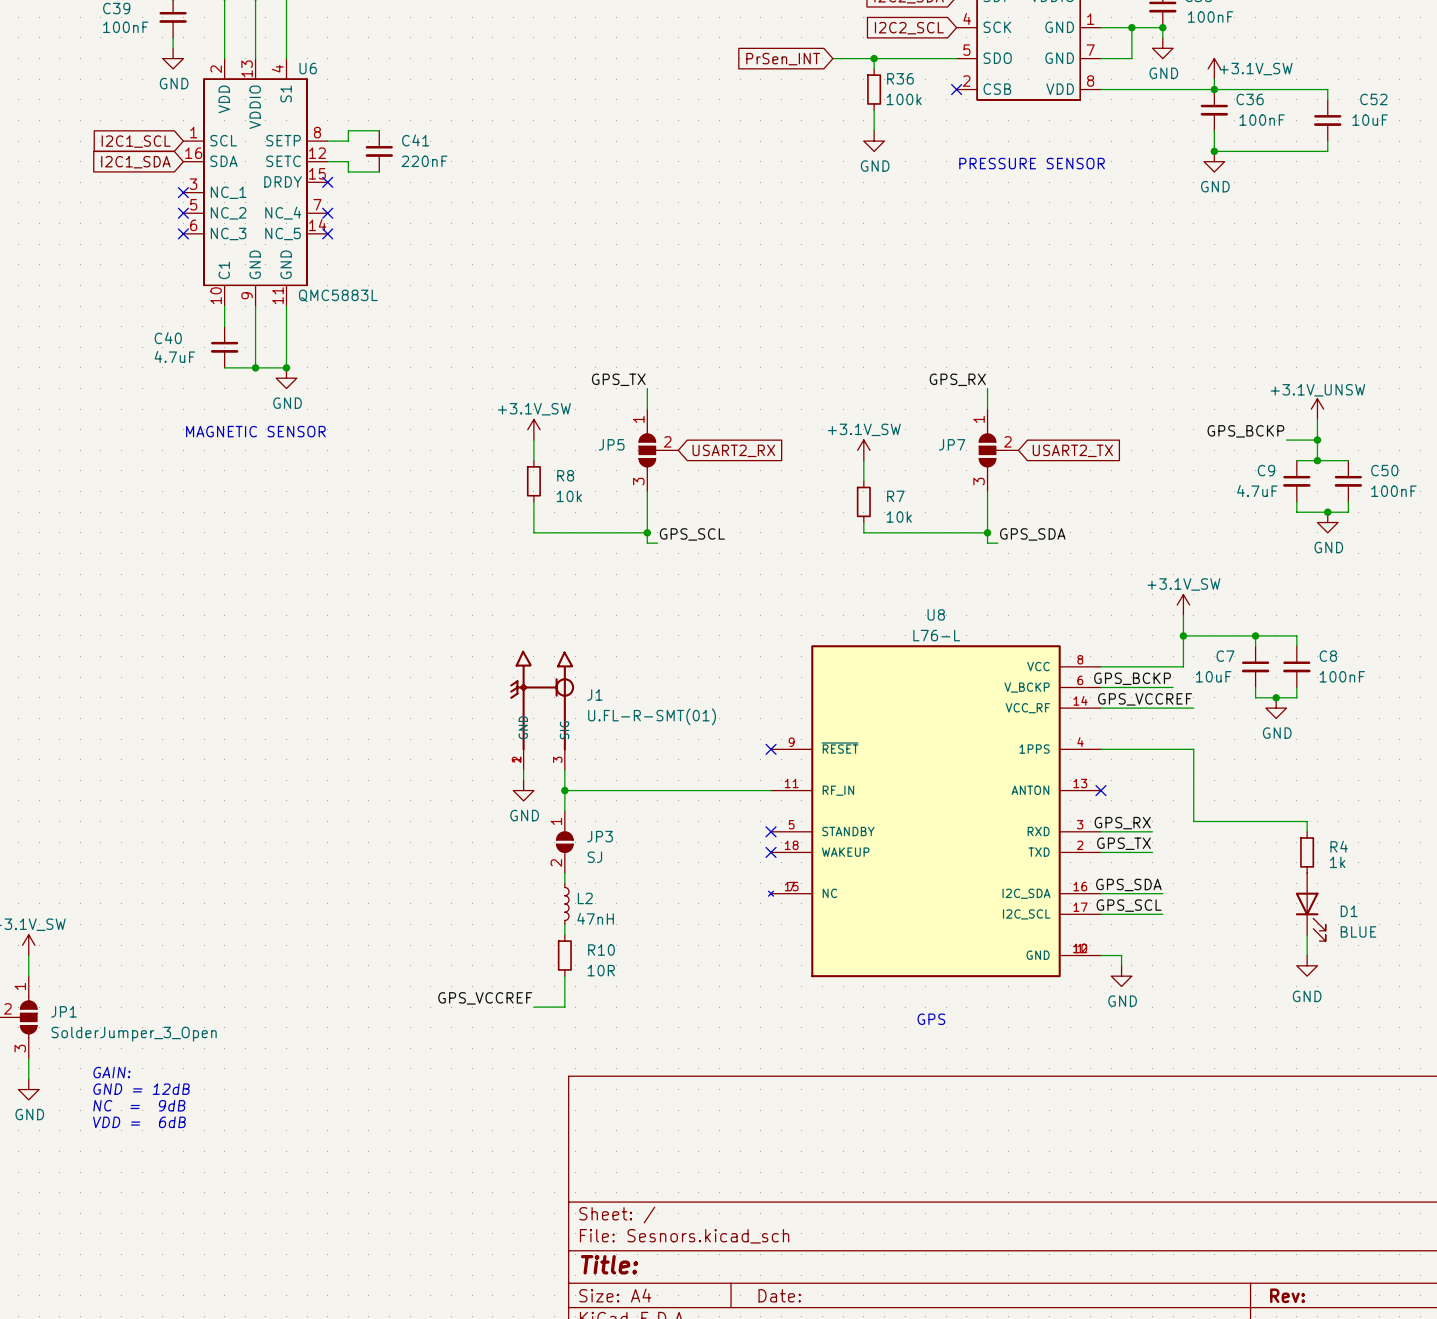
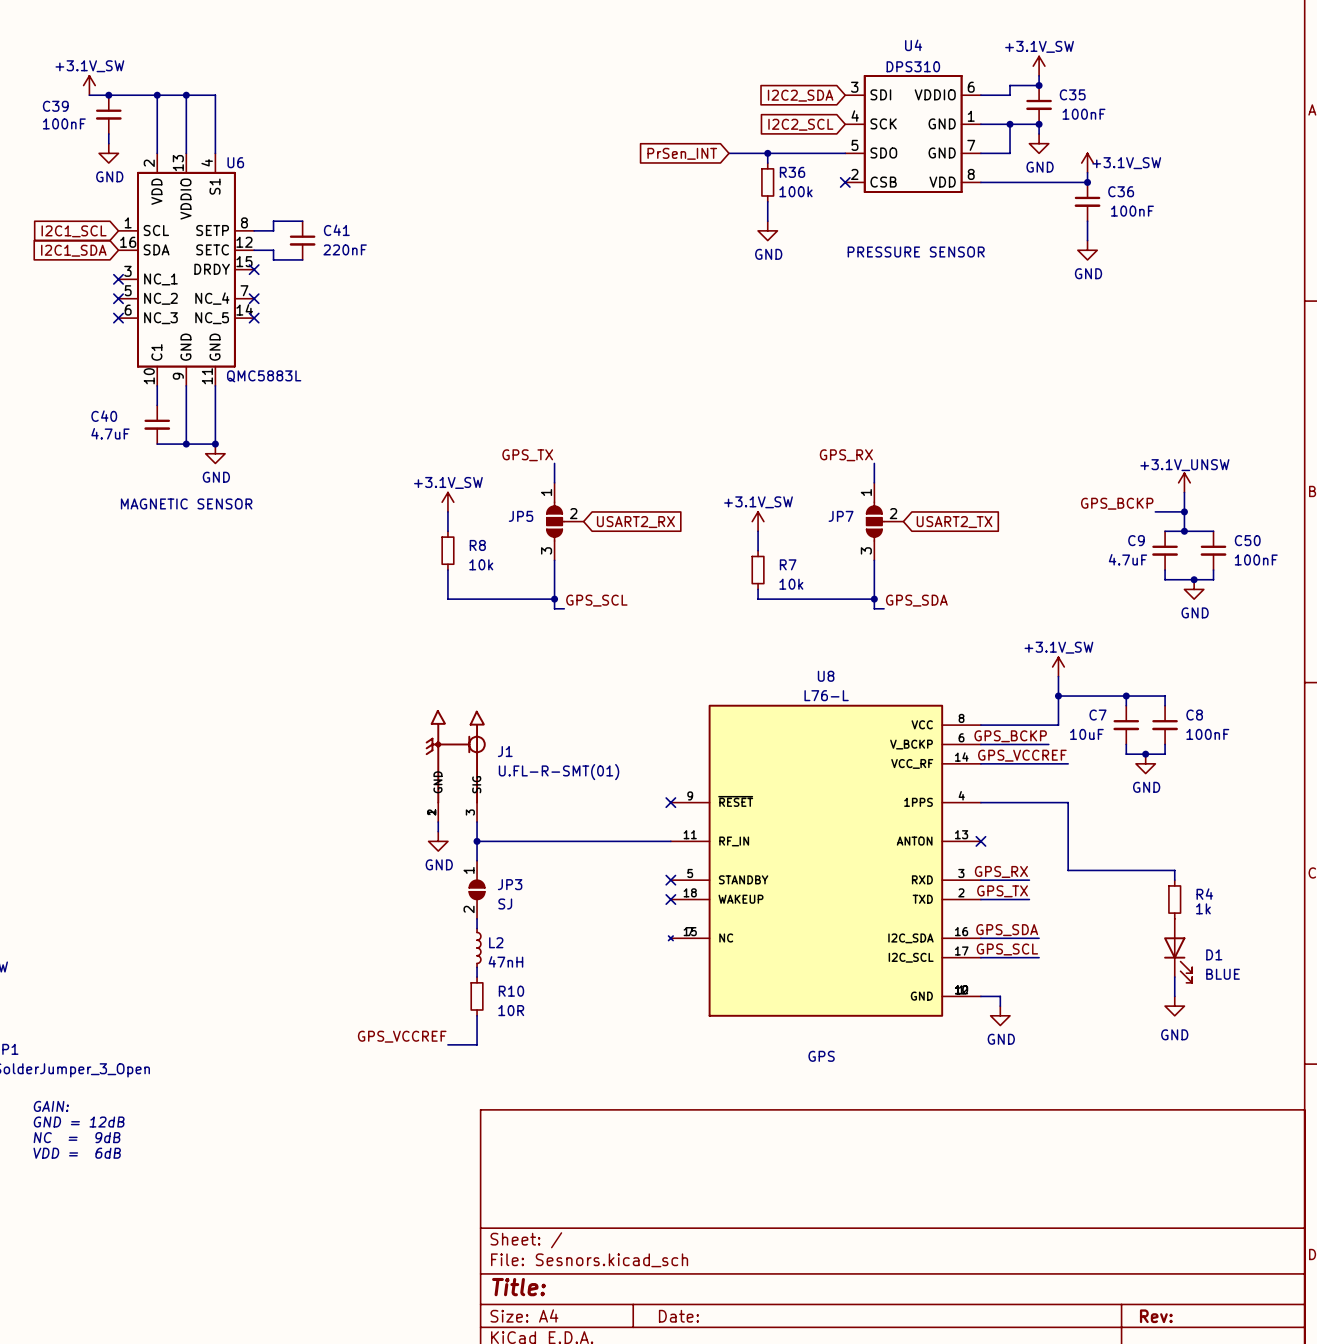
wire: (1214, 89) (1327, 89) (1327, 99) -> none
C52: 10uF (1327, 120) -> none
wire: (1327, 141) (1327, 151) (1214, 151) -> none
junction: (1214, 151) -> none

